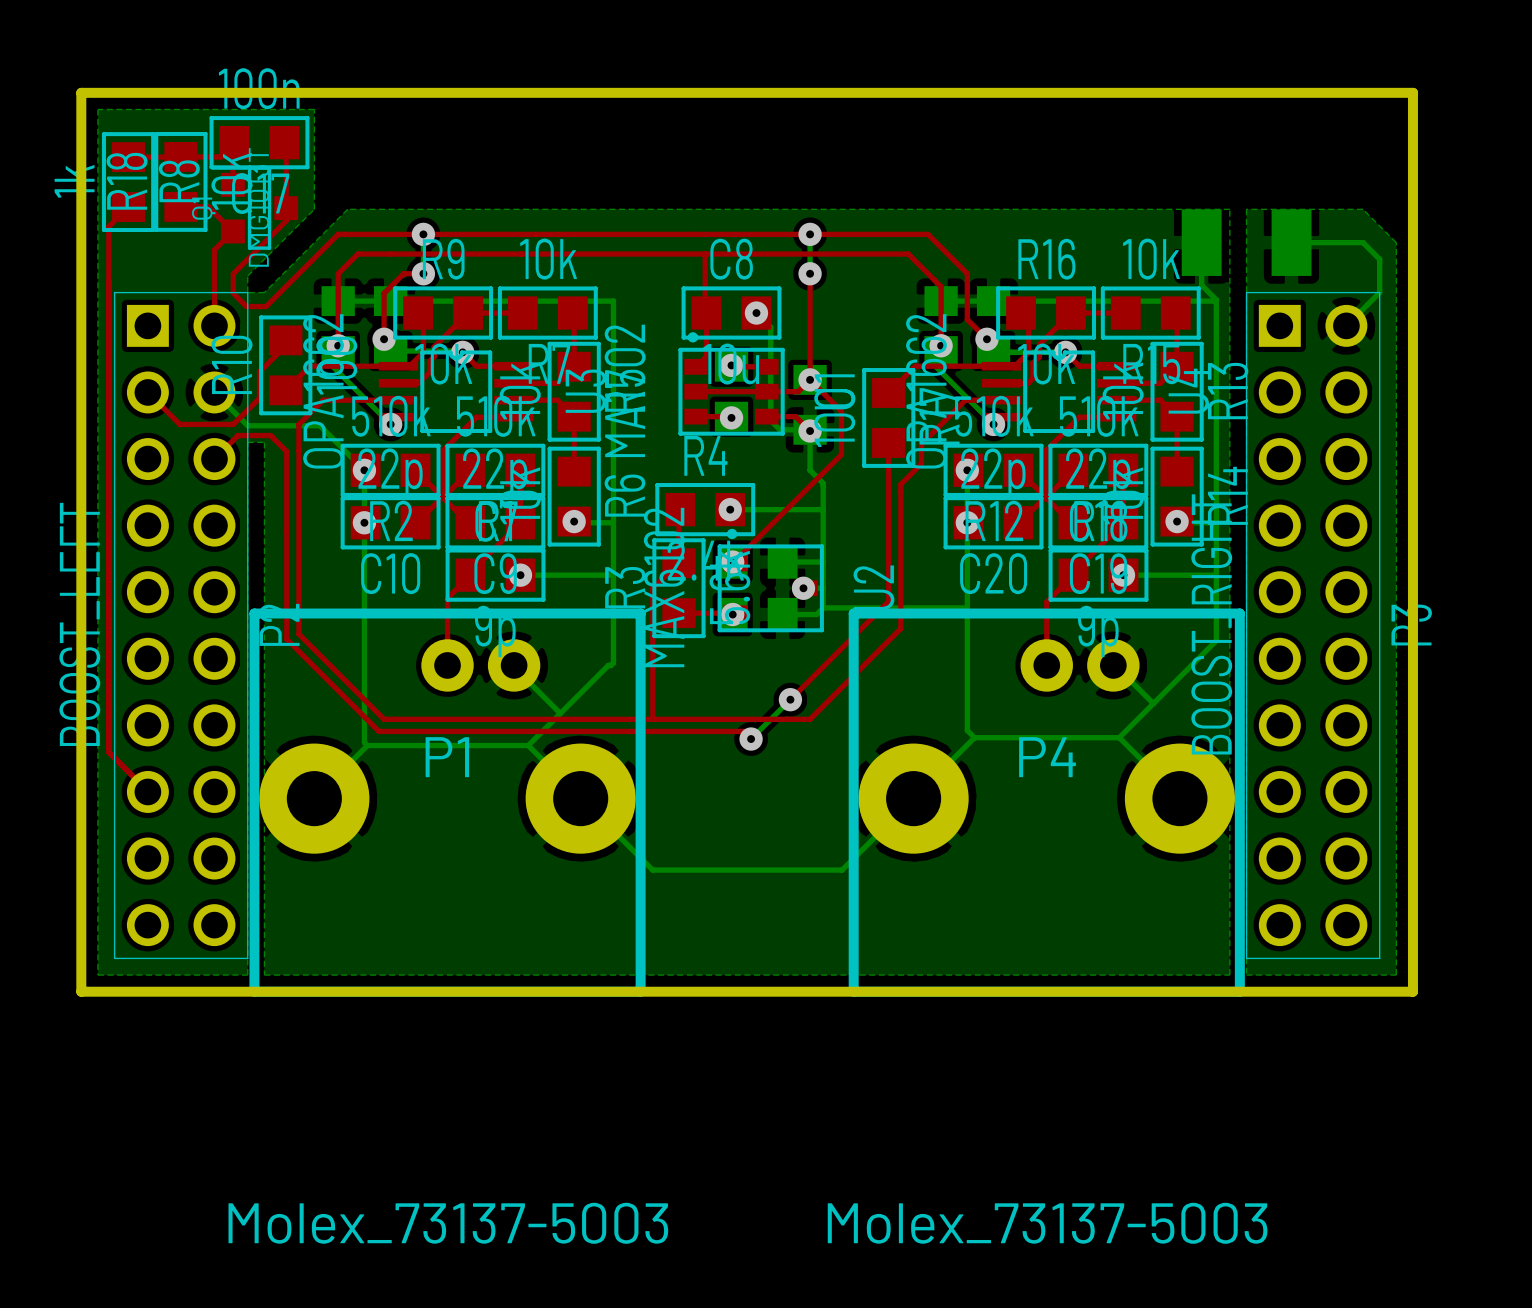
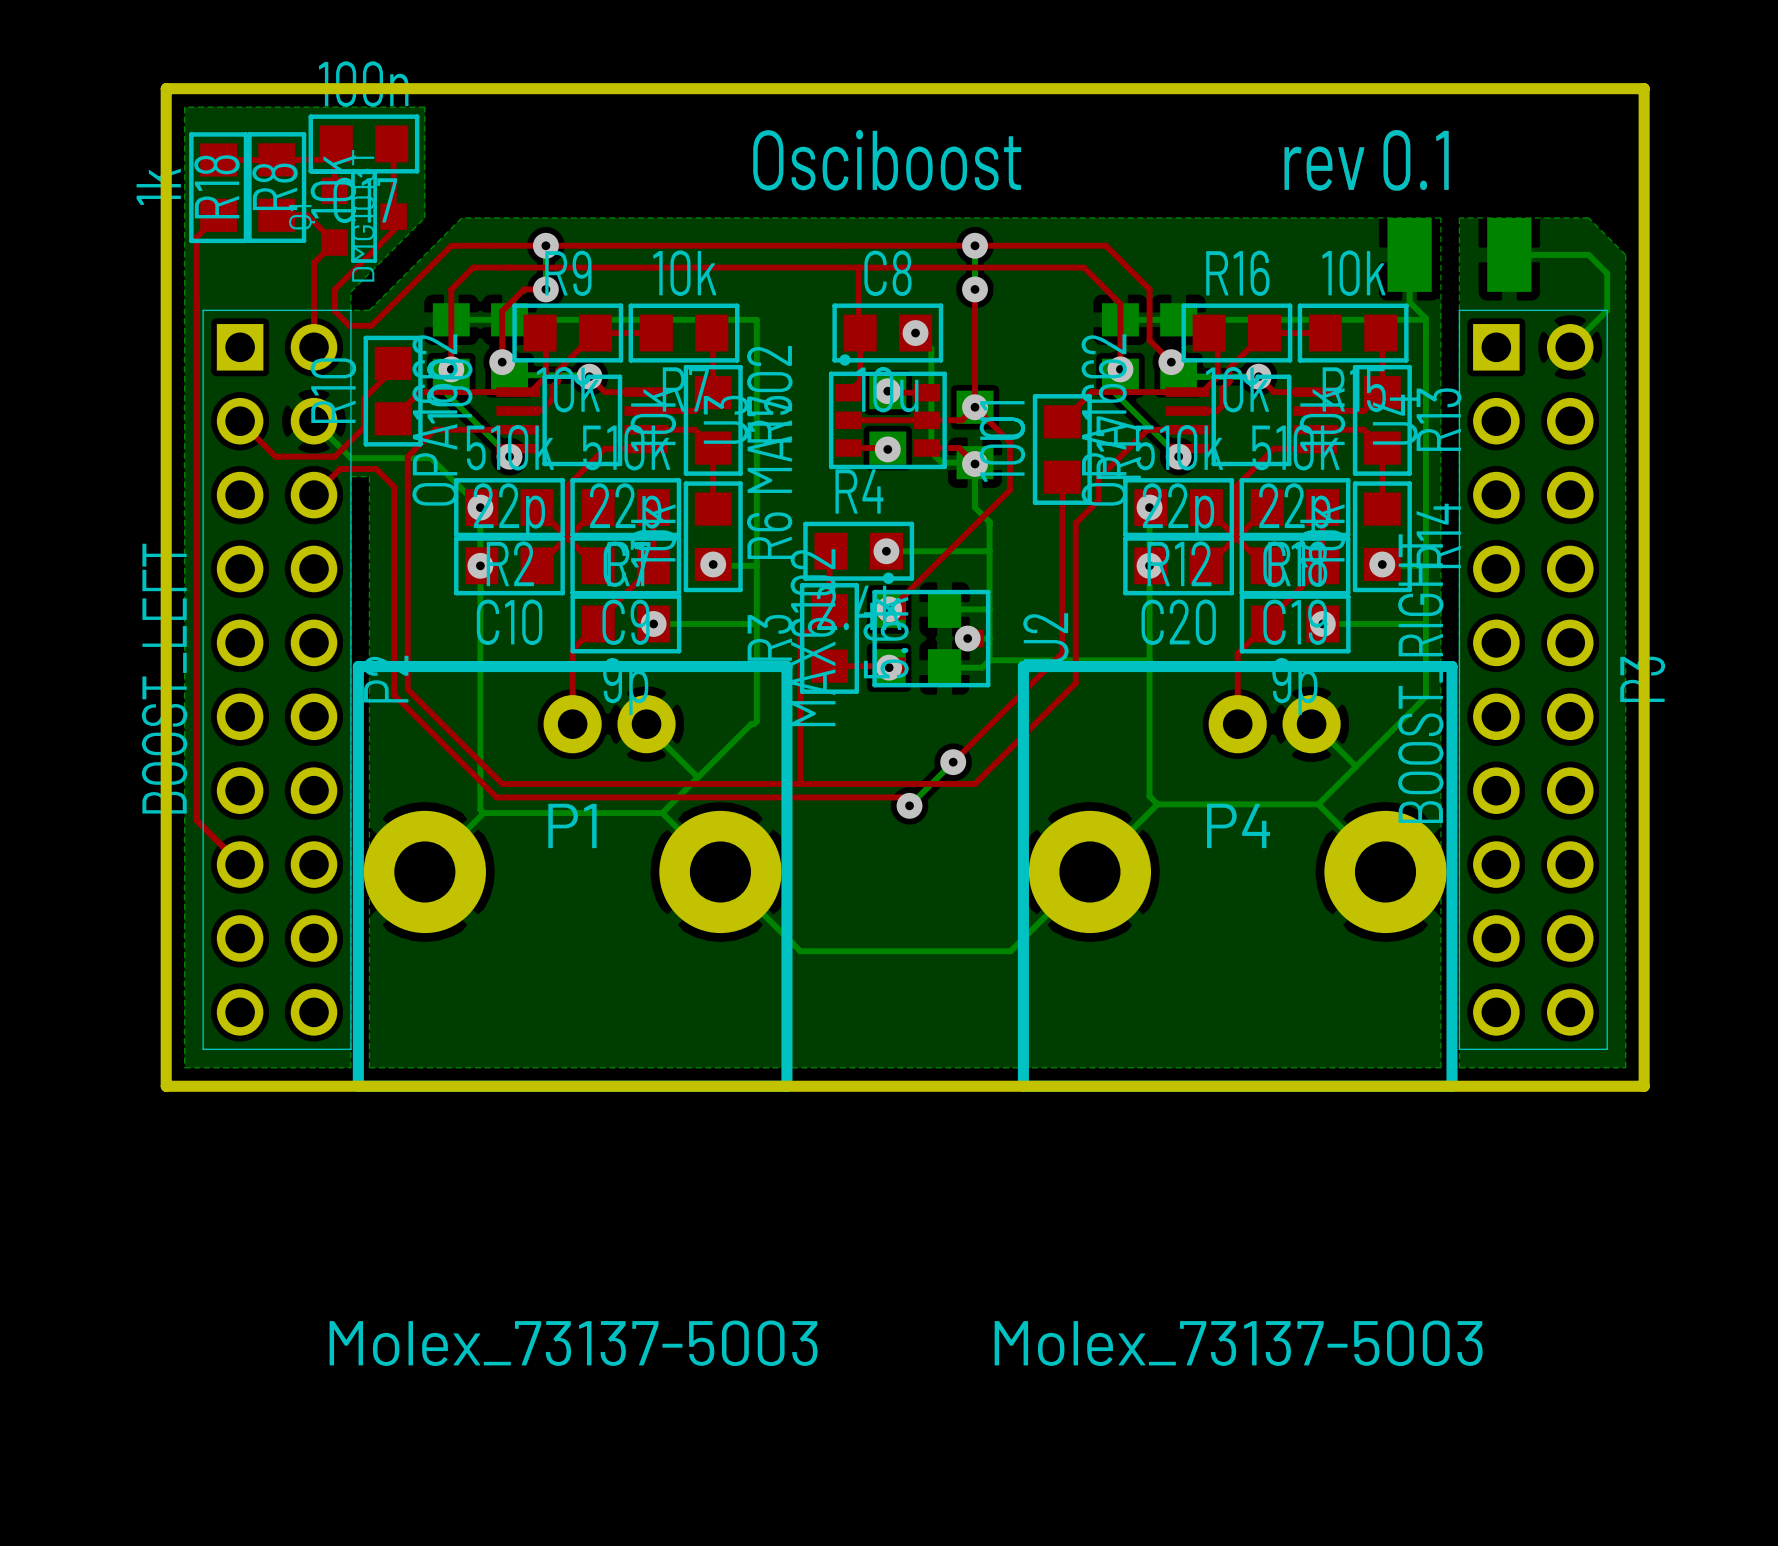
text: none -> Osciboost (887, 160)
text: none -> rev 0.1 (1366, 160)

